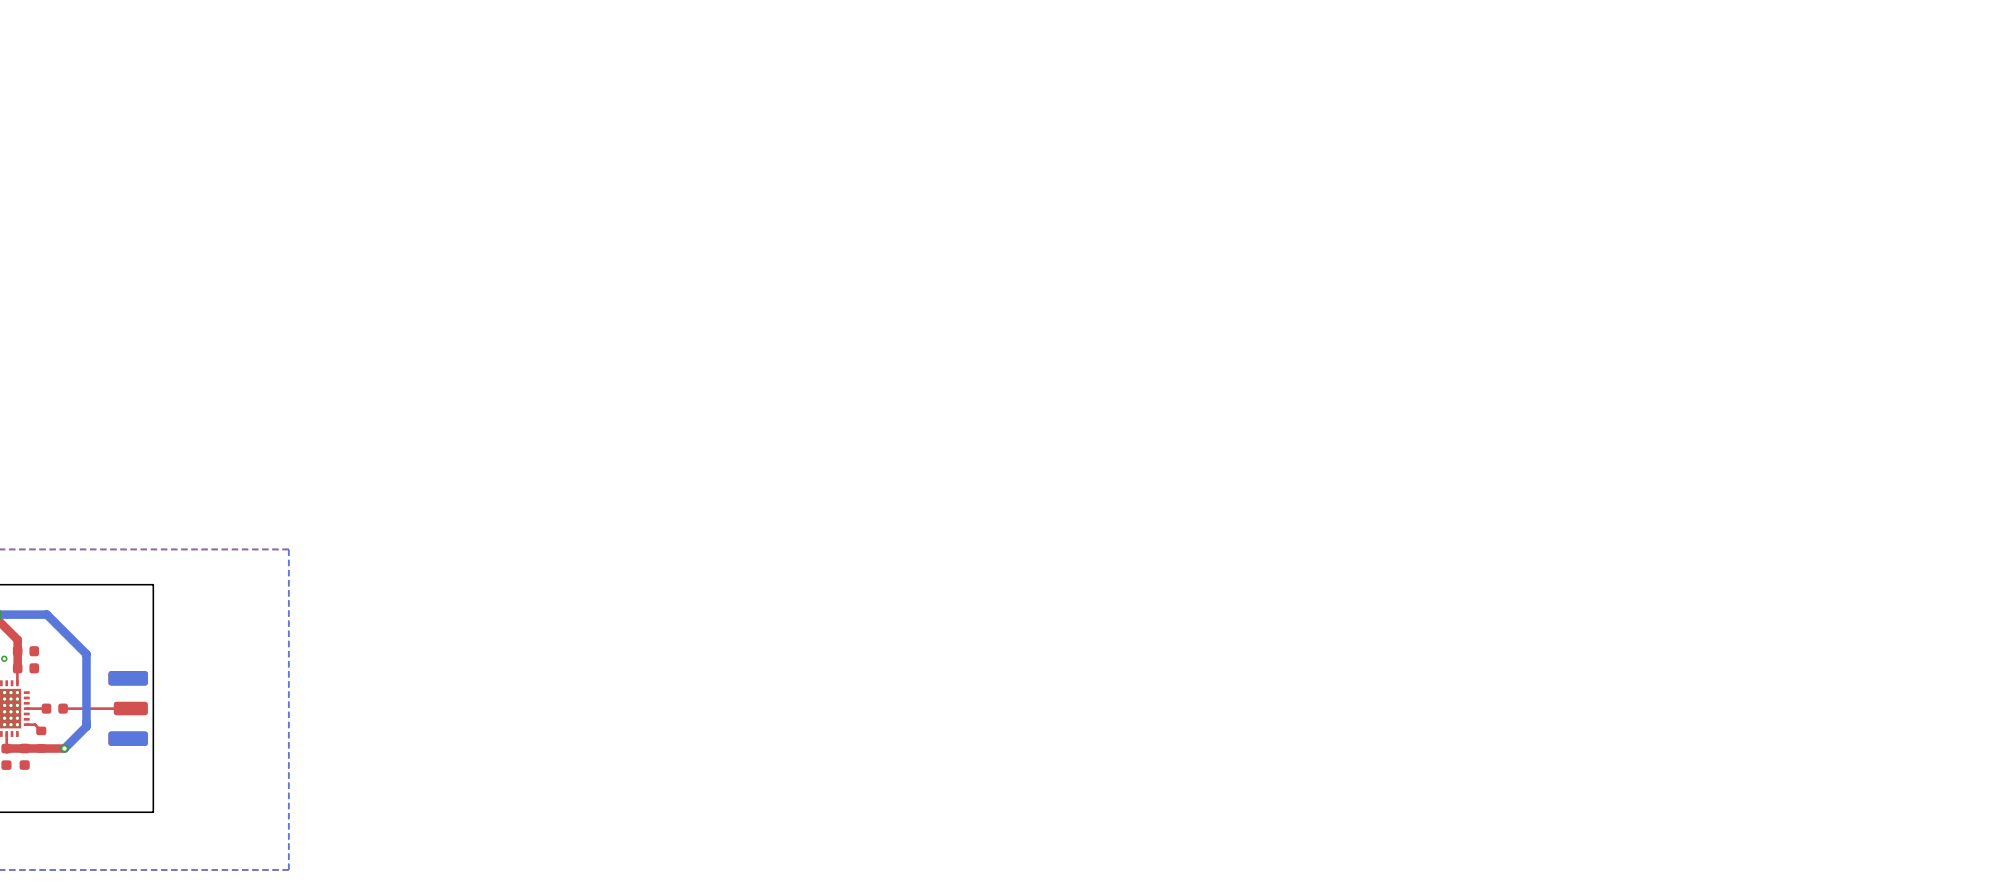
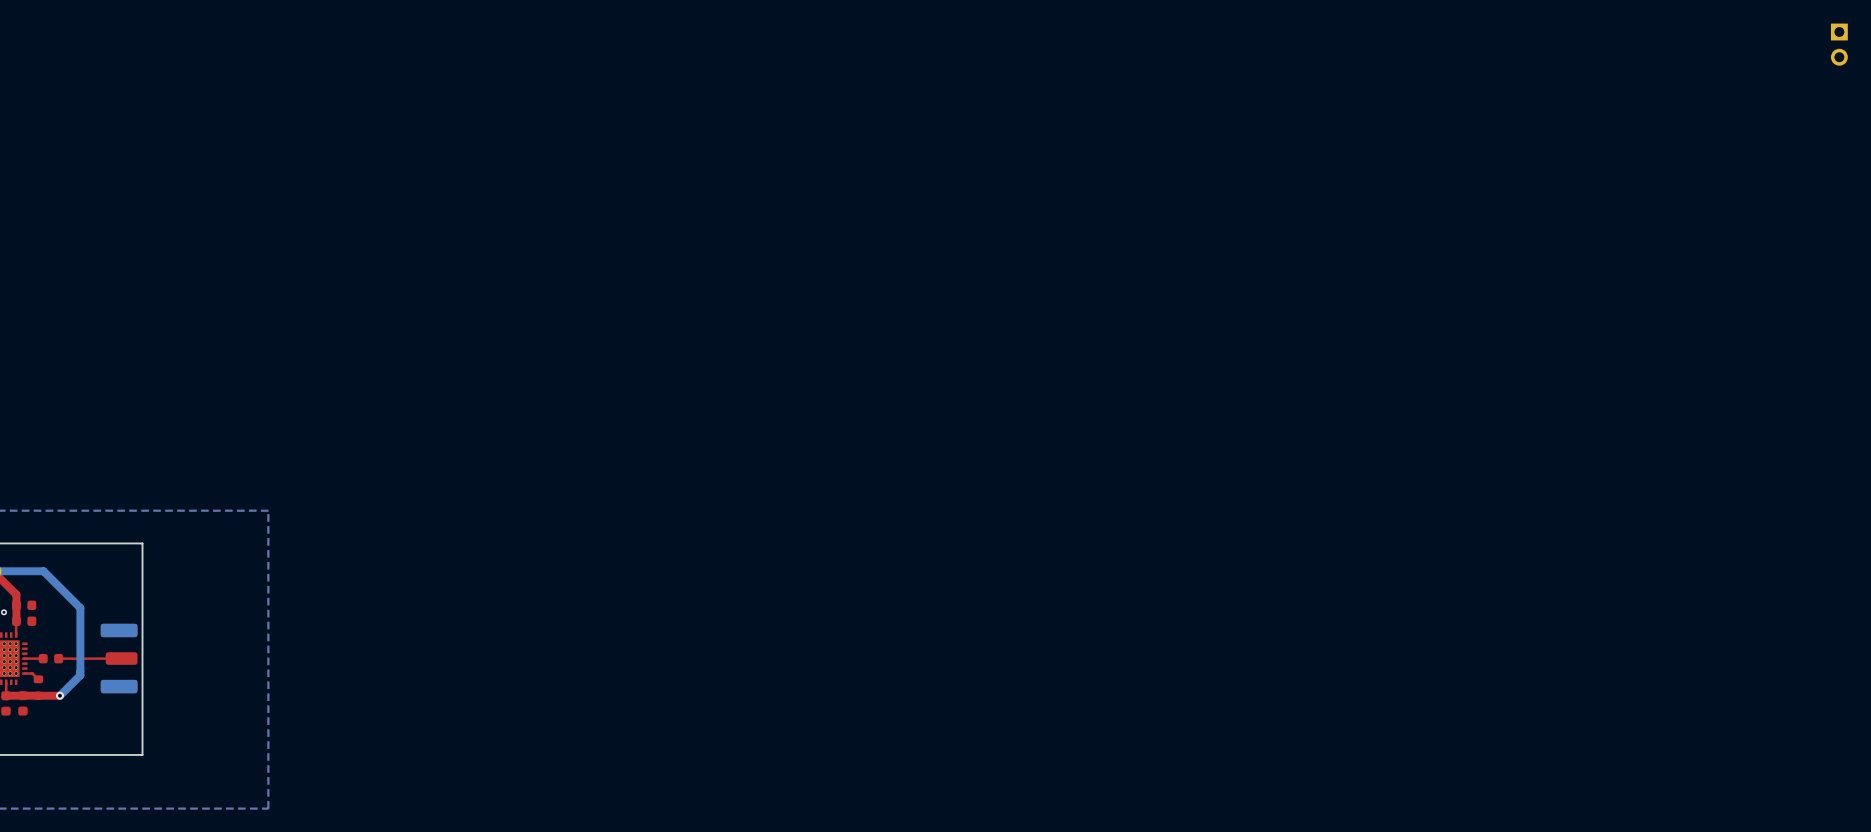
part: none -> (1839, 44)

